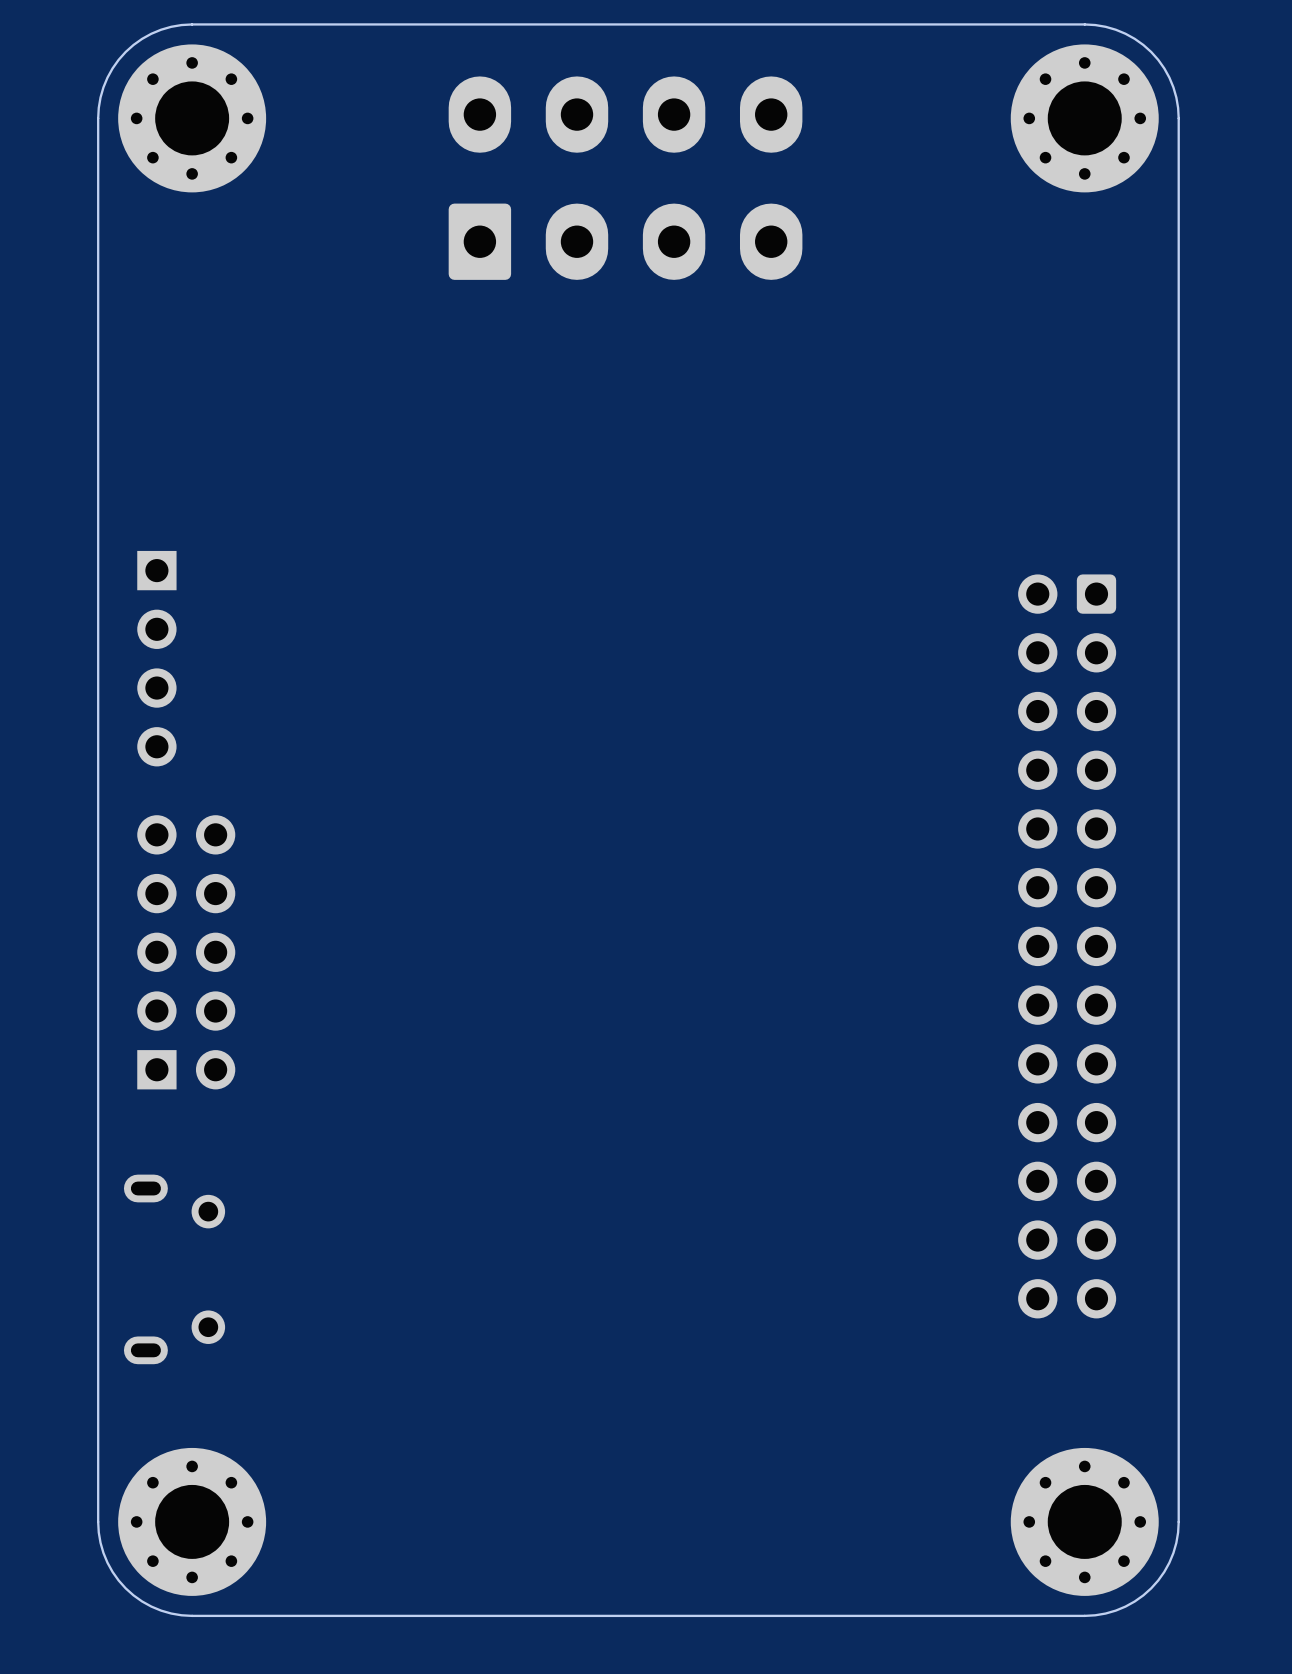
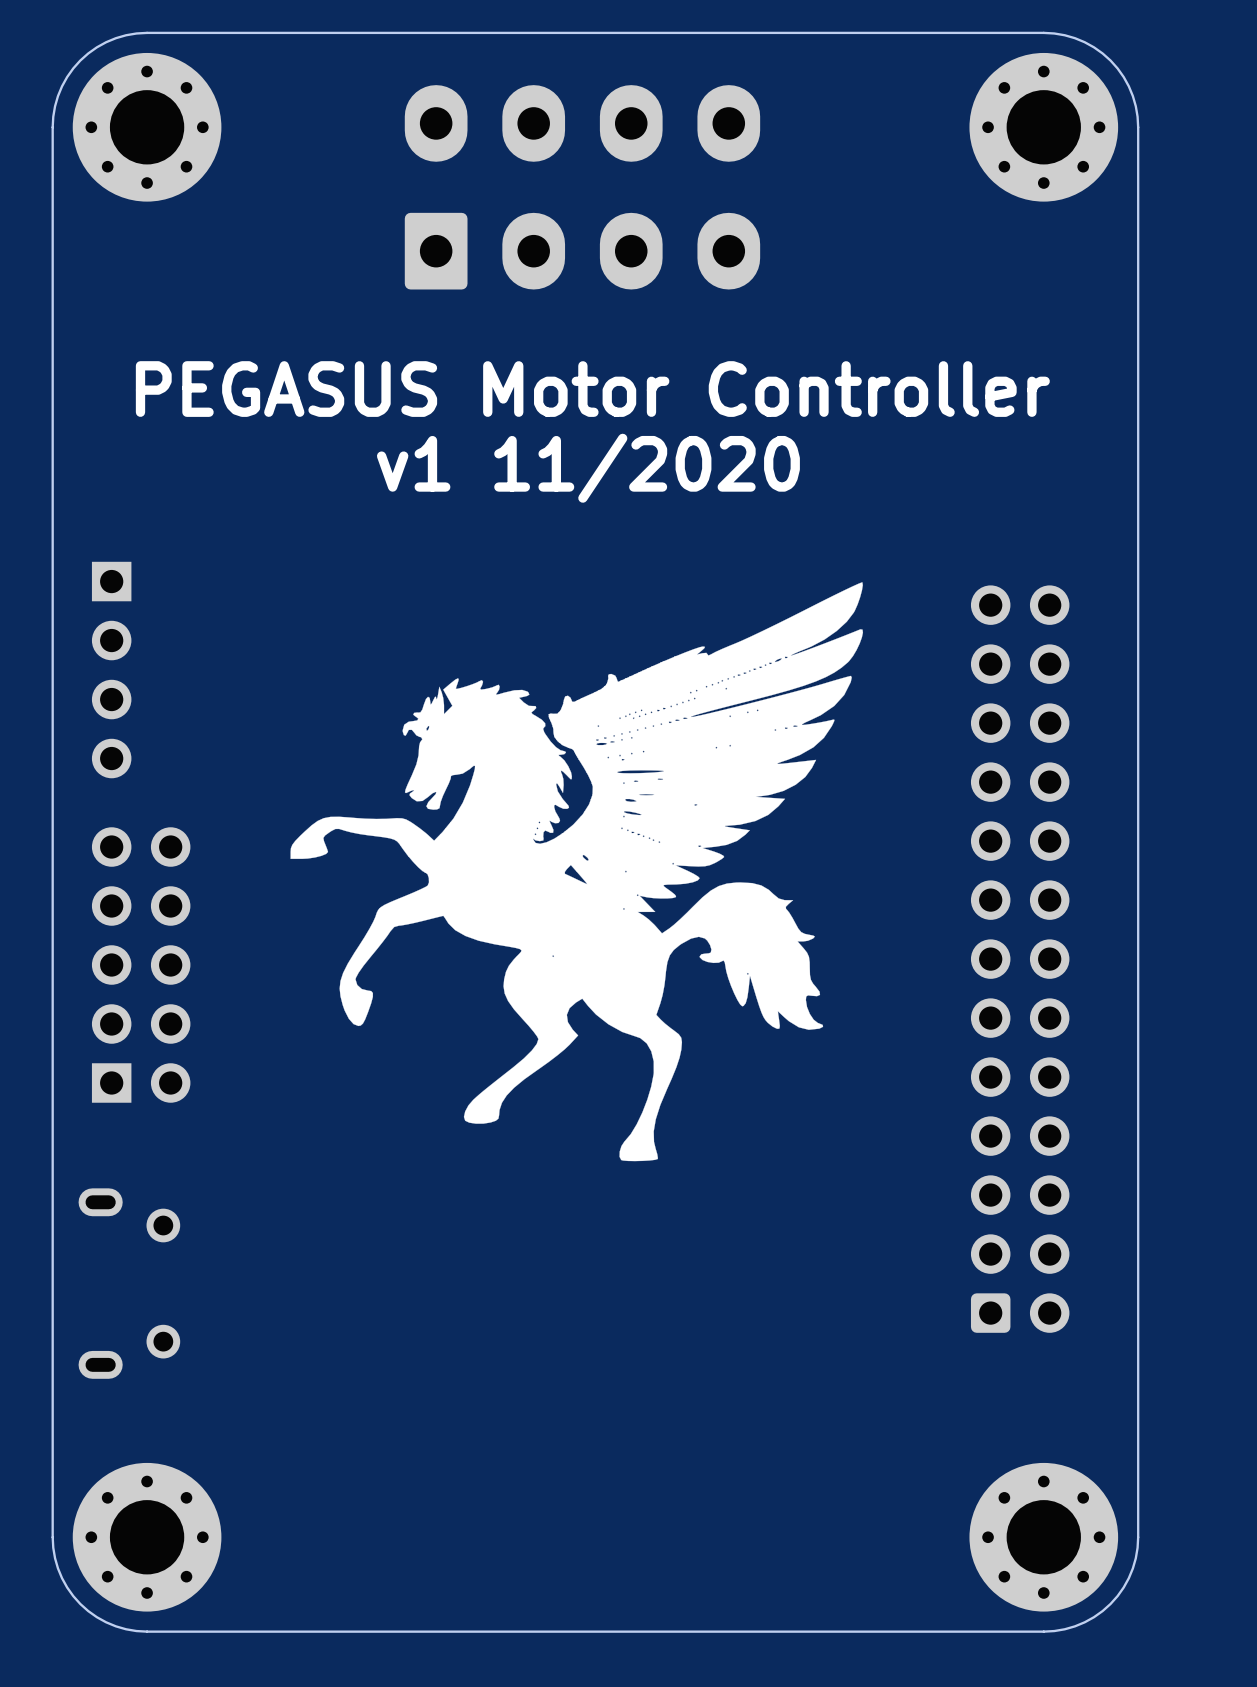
text: none -> PEGASUS Motor Controller (592, 389)
text: none -> v1 11/2020 (588, 468)
drawing: none -> [290, 582, 864, 1162]
part rotation: 0° (1067, 946) -> 180° (1020, 959)

